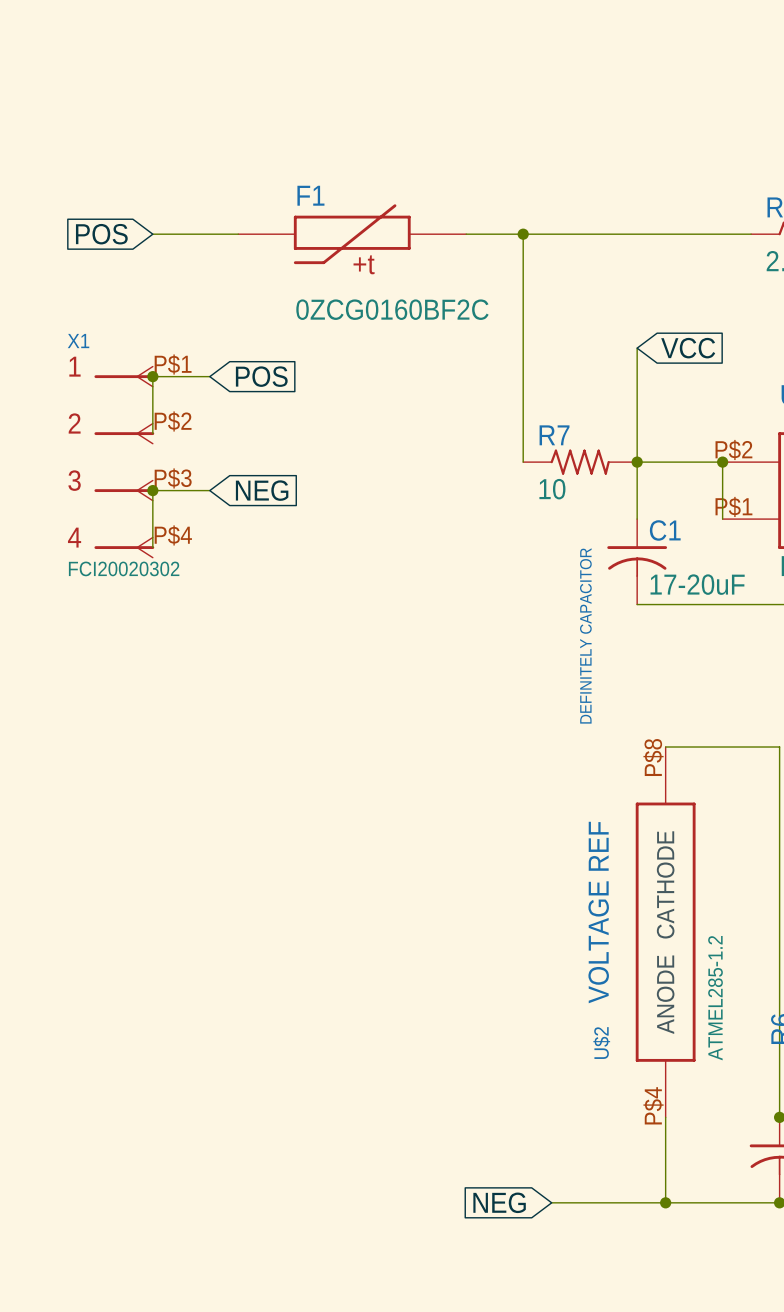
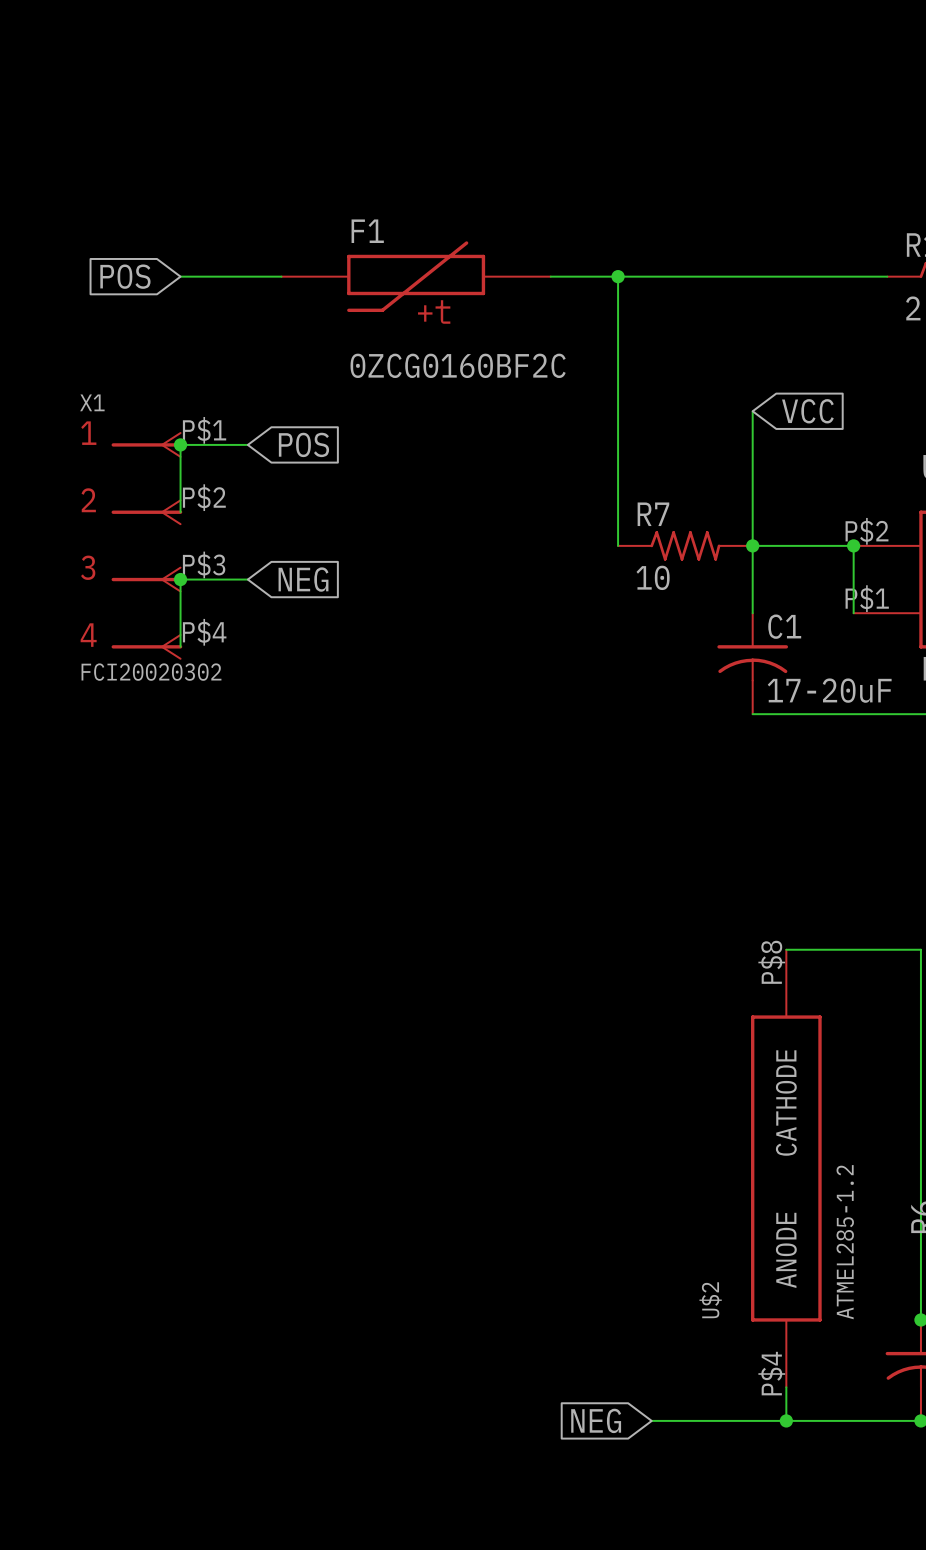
text: DEFINITELY CAPACITOR (585, 635) -> none
wire: (665, 747) (779, 747) (779, 803) -> (786, 949) (920, 949)
text: VOLTAGE REF (598, 912) -> none
U$2 position: (665, 932) -> (786, 1168)

